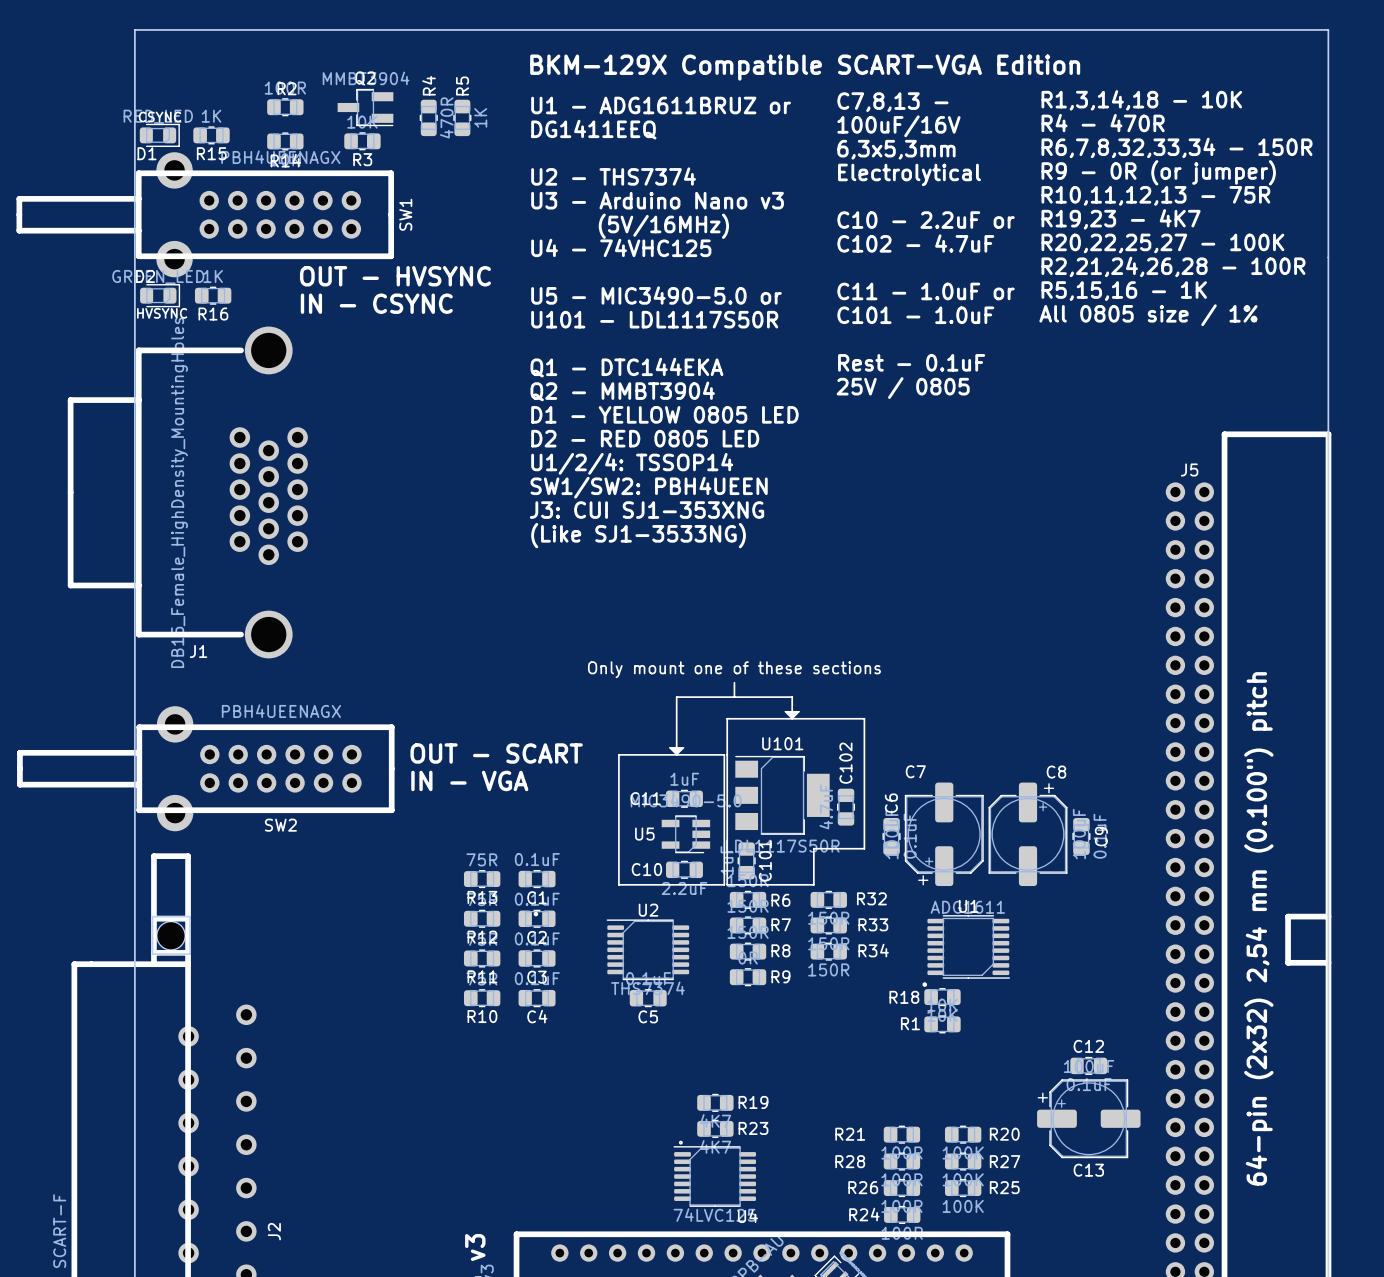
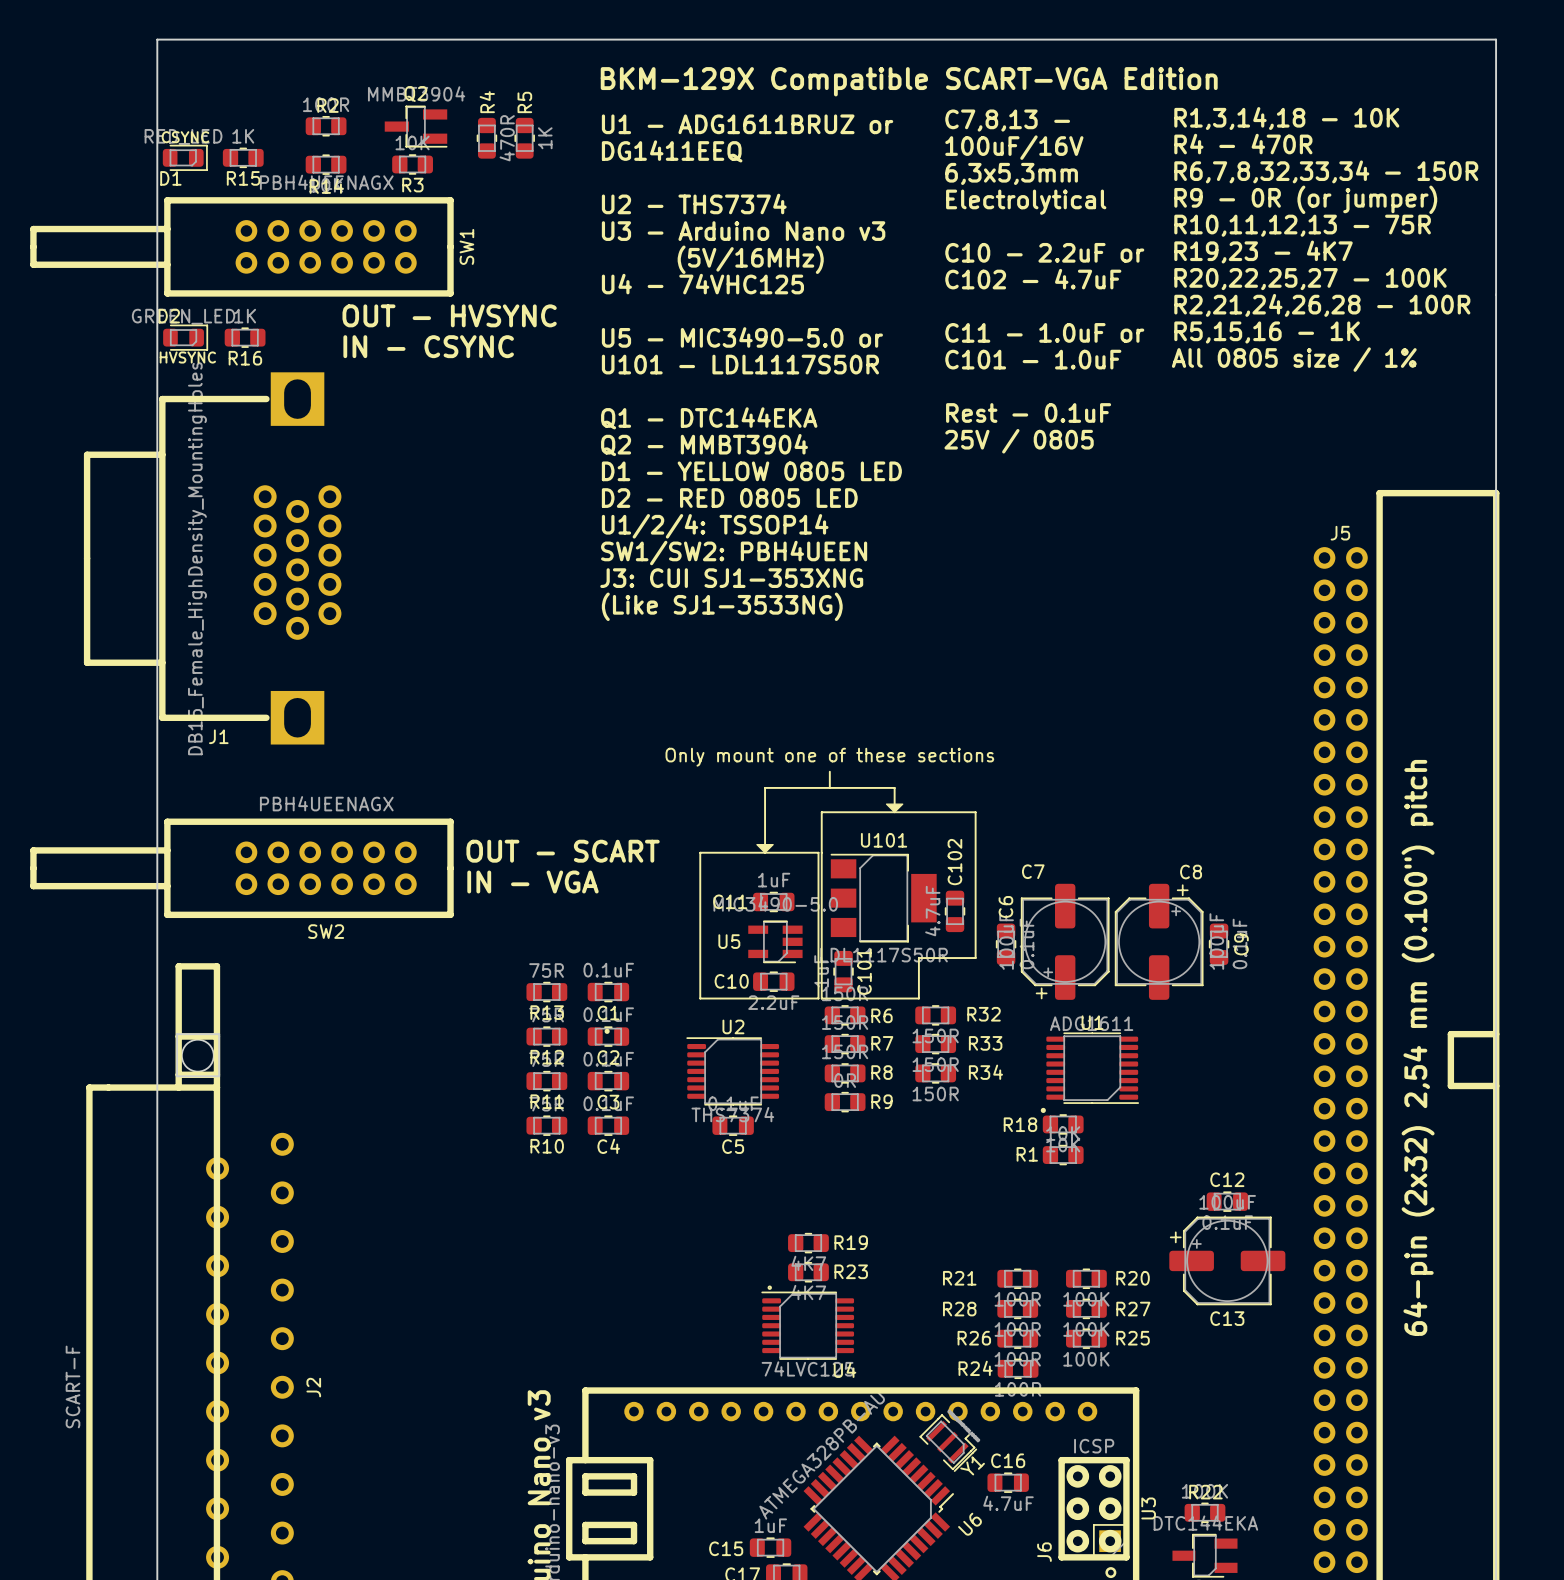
SW1 footprint: [16, 152, 394, 278] -> [30, 197, 454, 297]
J1 footprint: [67, 326, 308, 659] -> [83, 372, 342, 745]
SW2 footprint: [17, 706, 395, 832] -> [30, 818, 454, 919]

